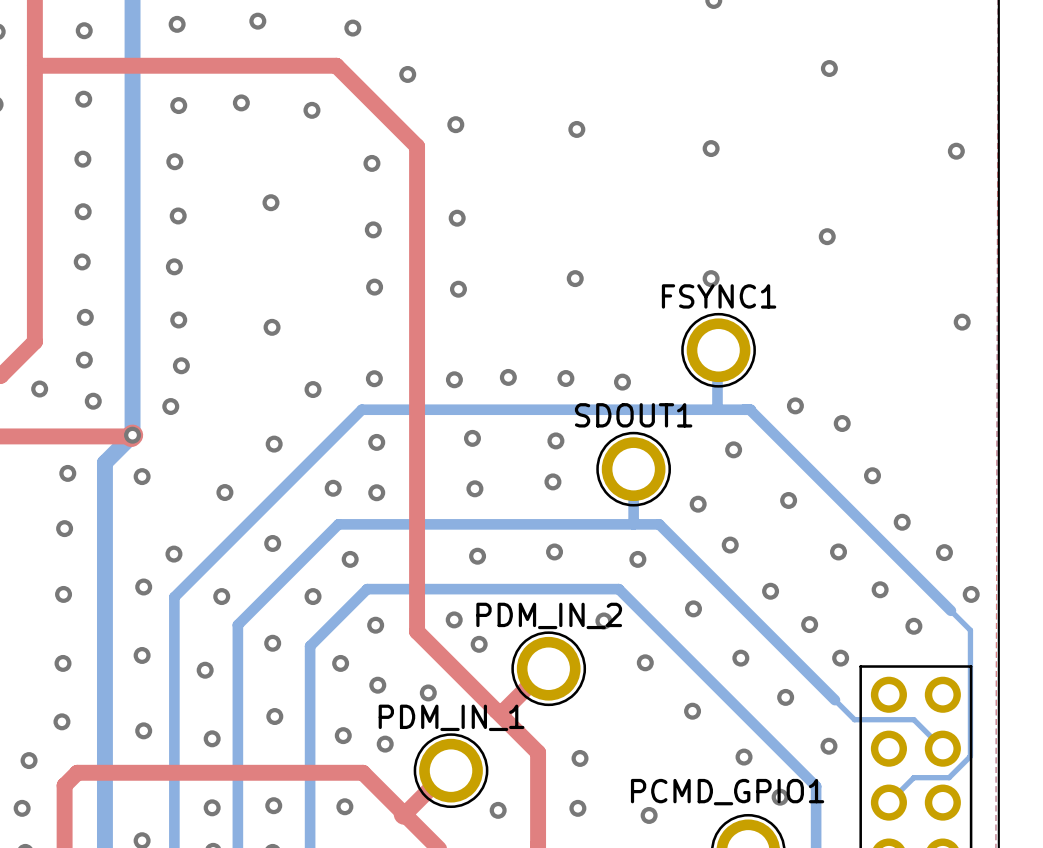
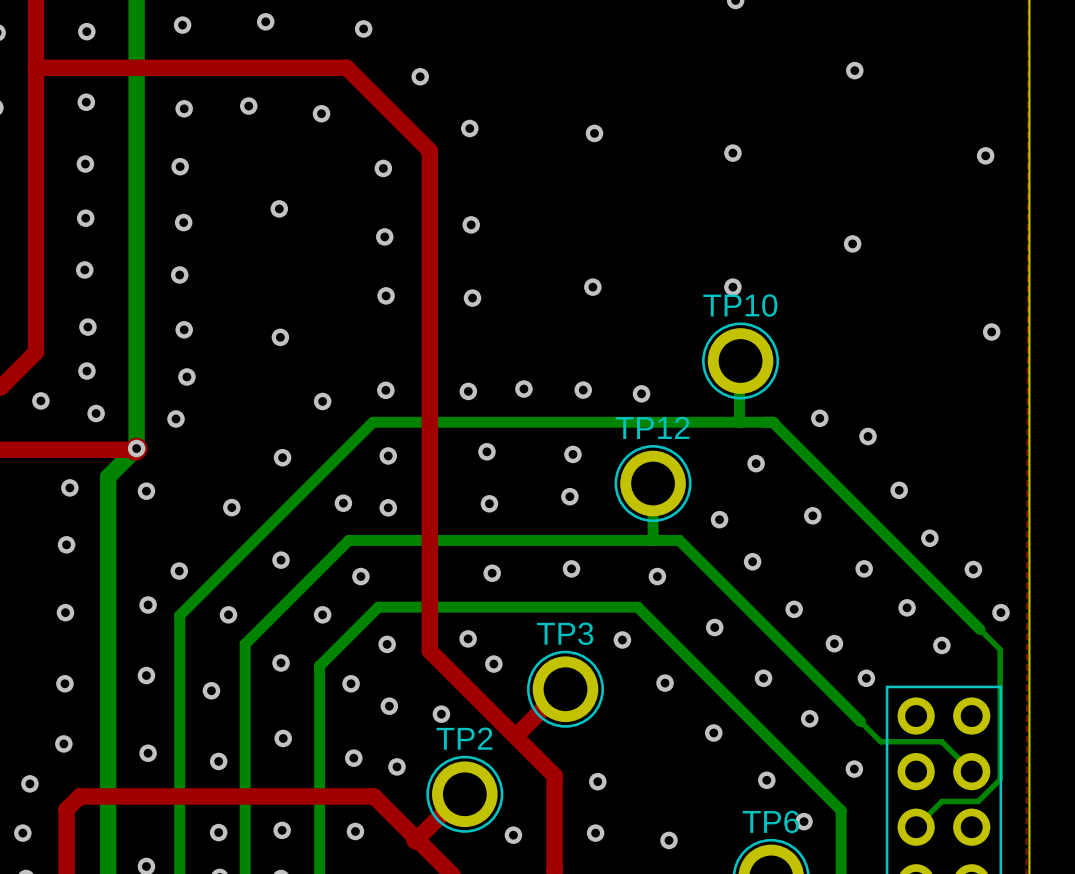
FSYNC1 name: FSYNC1 (719, 296) -> TP10 (740, 305)
SDOUT1 name: SDOUT1 (633, 415) -> TP12 (652, 427)
PDM_IN_2 name: PDM_IN_2 (549, 615) -> TP3 (565, 633)
PDM_IN_1 name: PDM_IN_1 (451, 717) -> TP2 (464, 738)
PCMD_GPIO1 name: PCMD_GPIO1 (727, 792) -> TP6 (770, 821)

